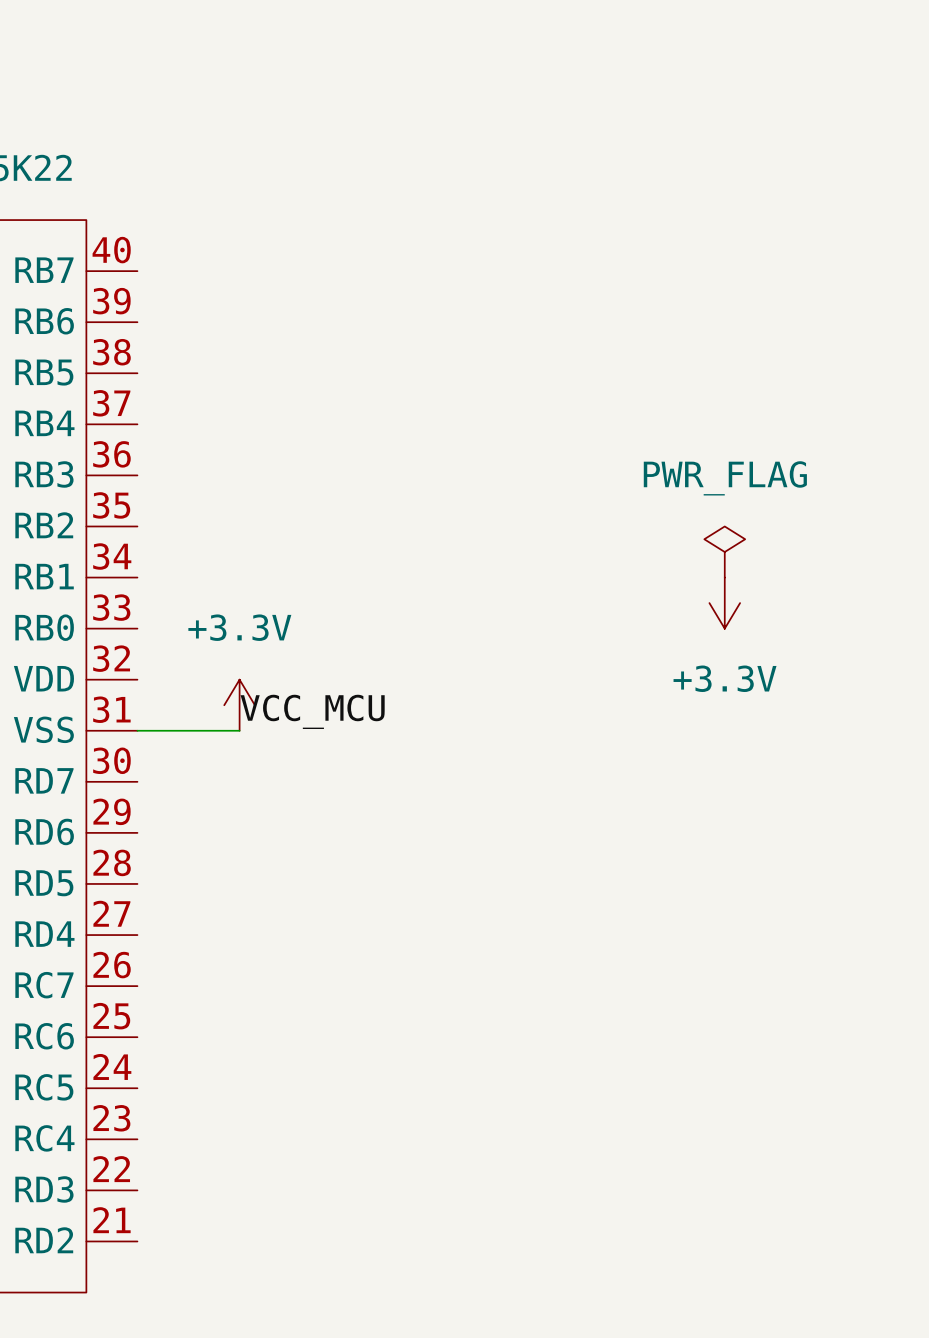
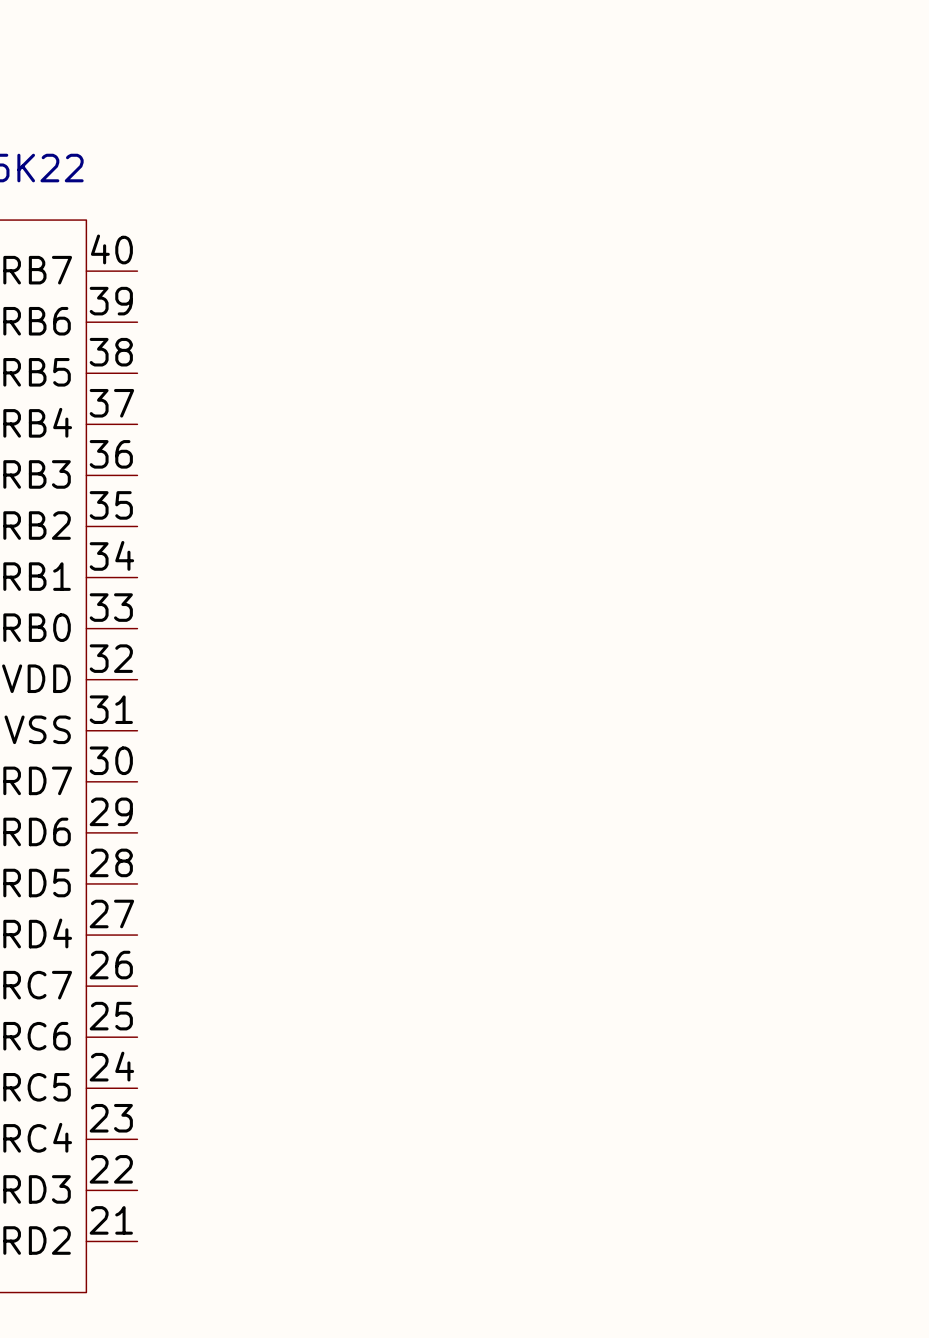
power symbol: PWR_FLAG (724, 552) -> none
power symbol: +3.3V (724, 603) -> none
power symbol: +3.3V (239, 705) -> none
label: VCC_MCU (312, 711) -> none
wire: (137, 730) (239, 730) -> none

